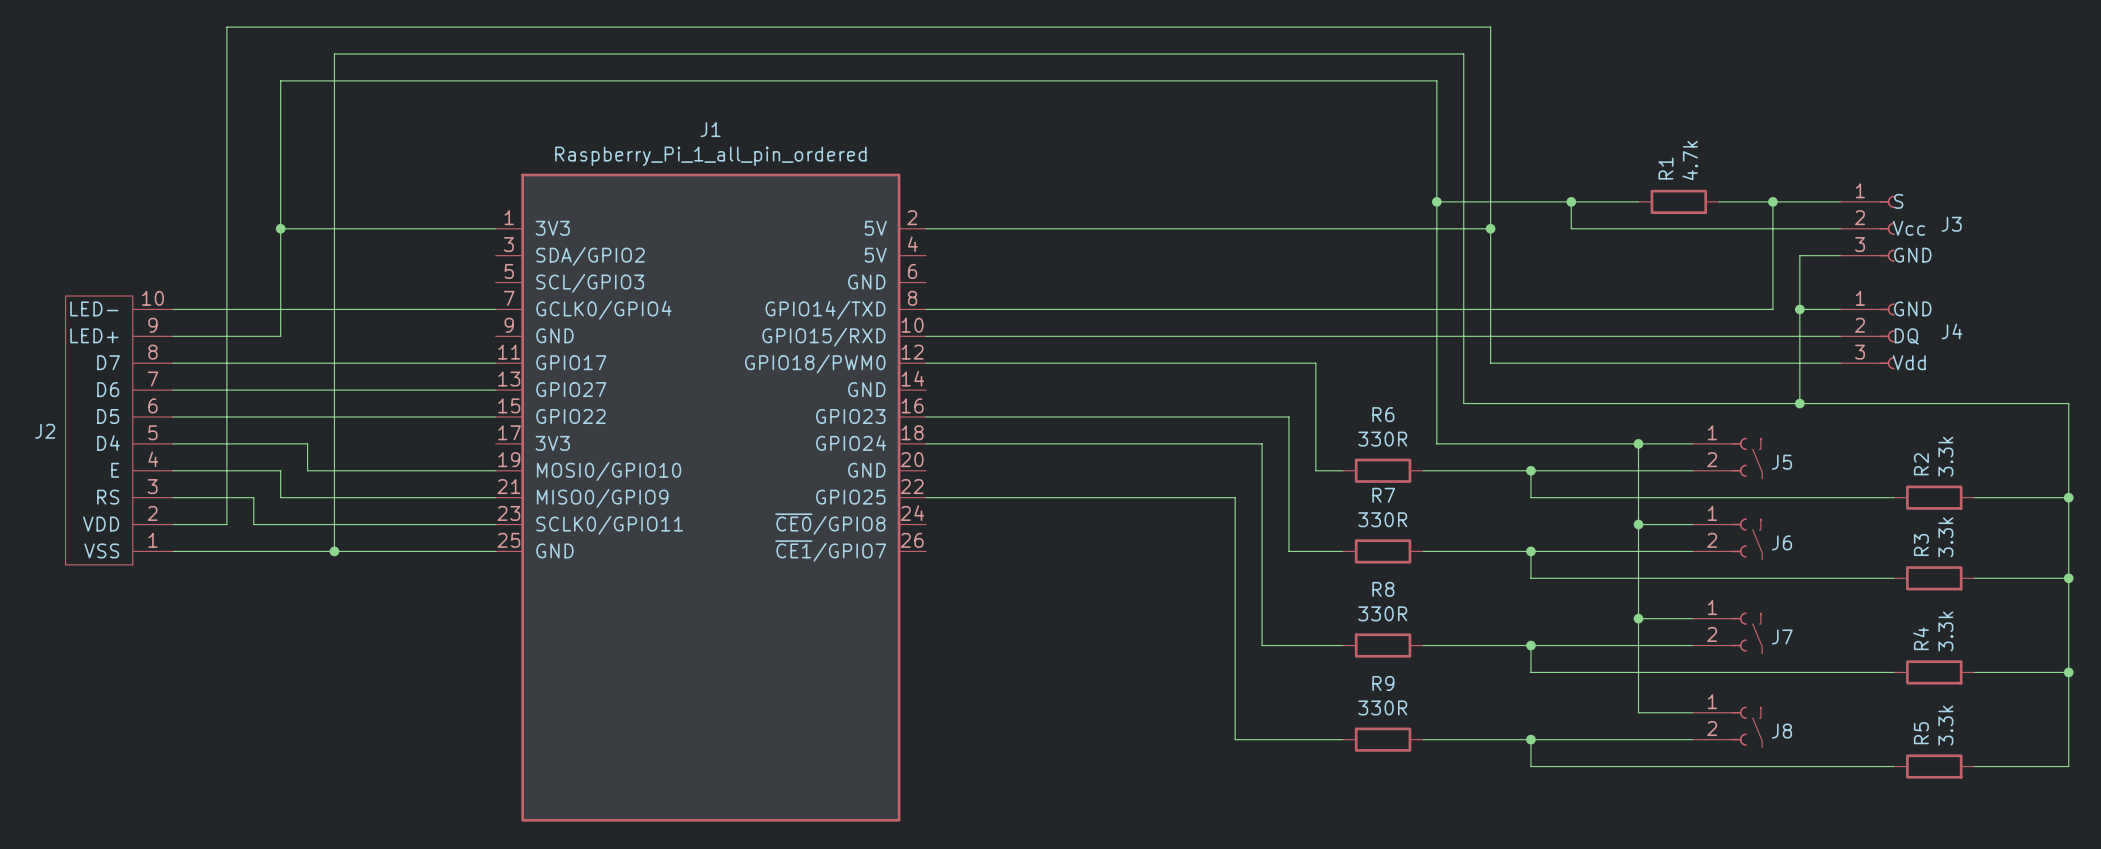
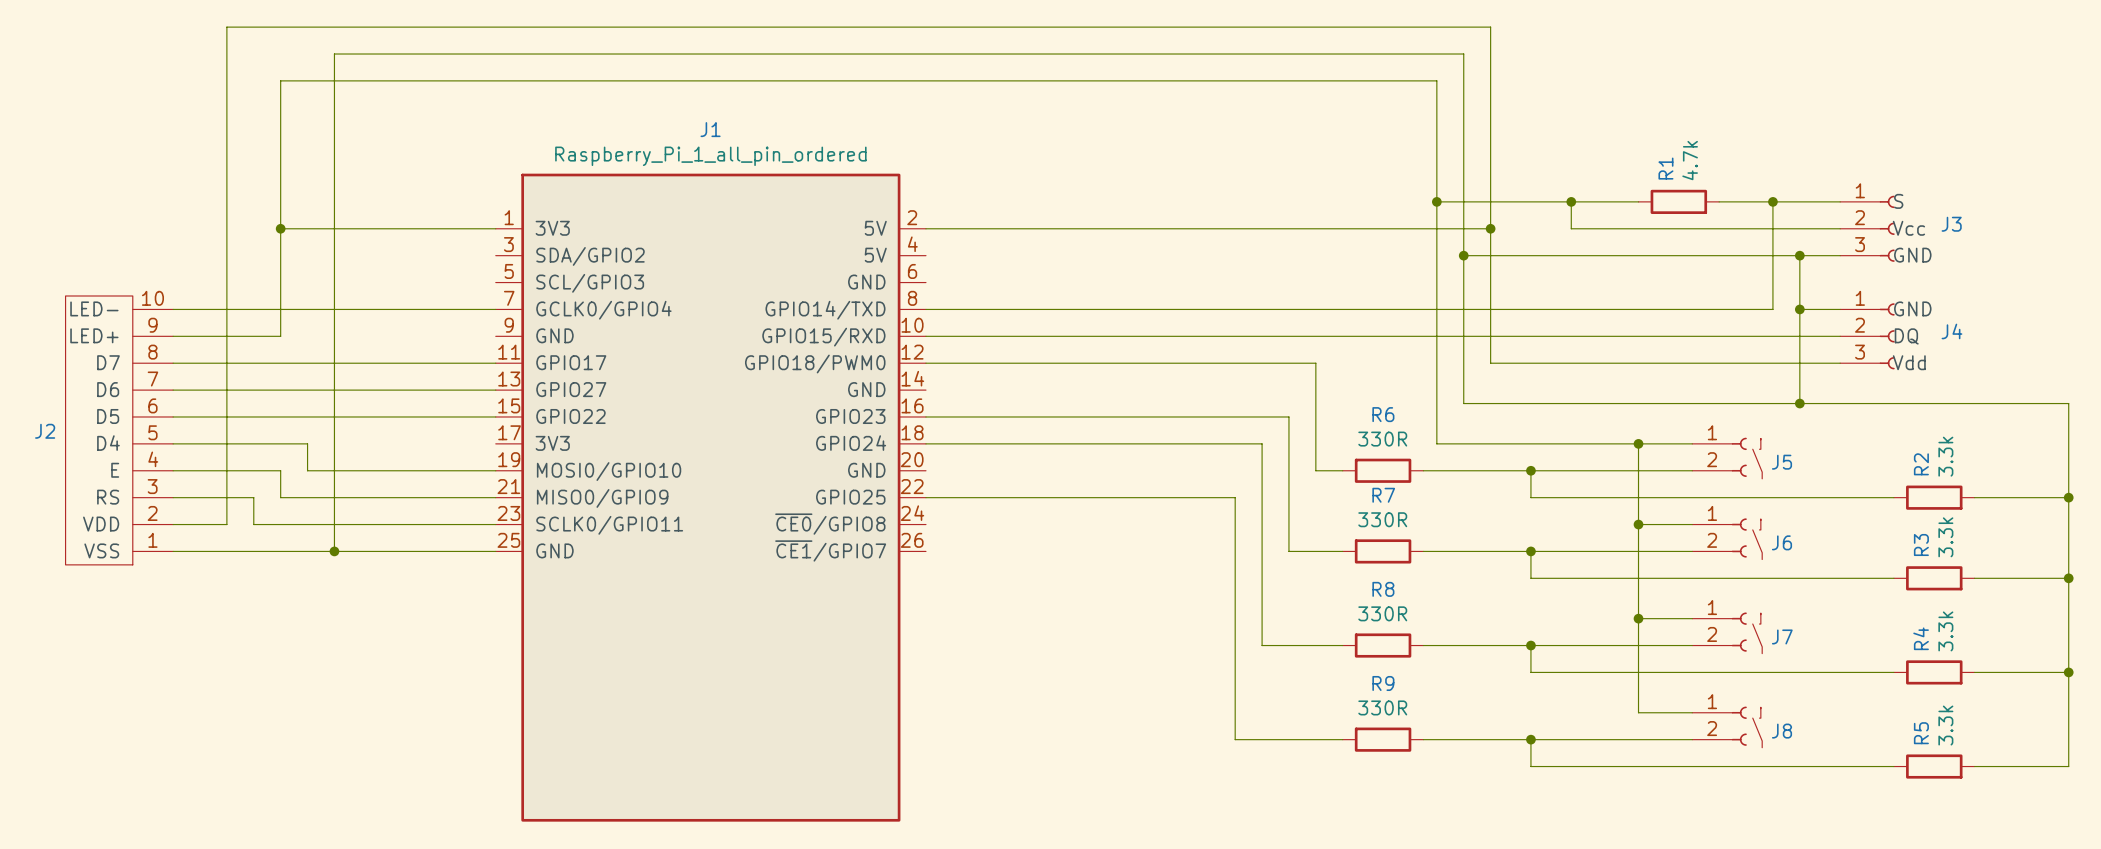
wire: none -> (1463, 255) (1799, 255)
junction: none -> (1463, 255)
junction: none -> (1799, 255)

